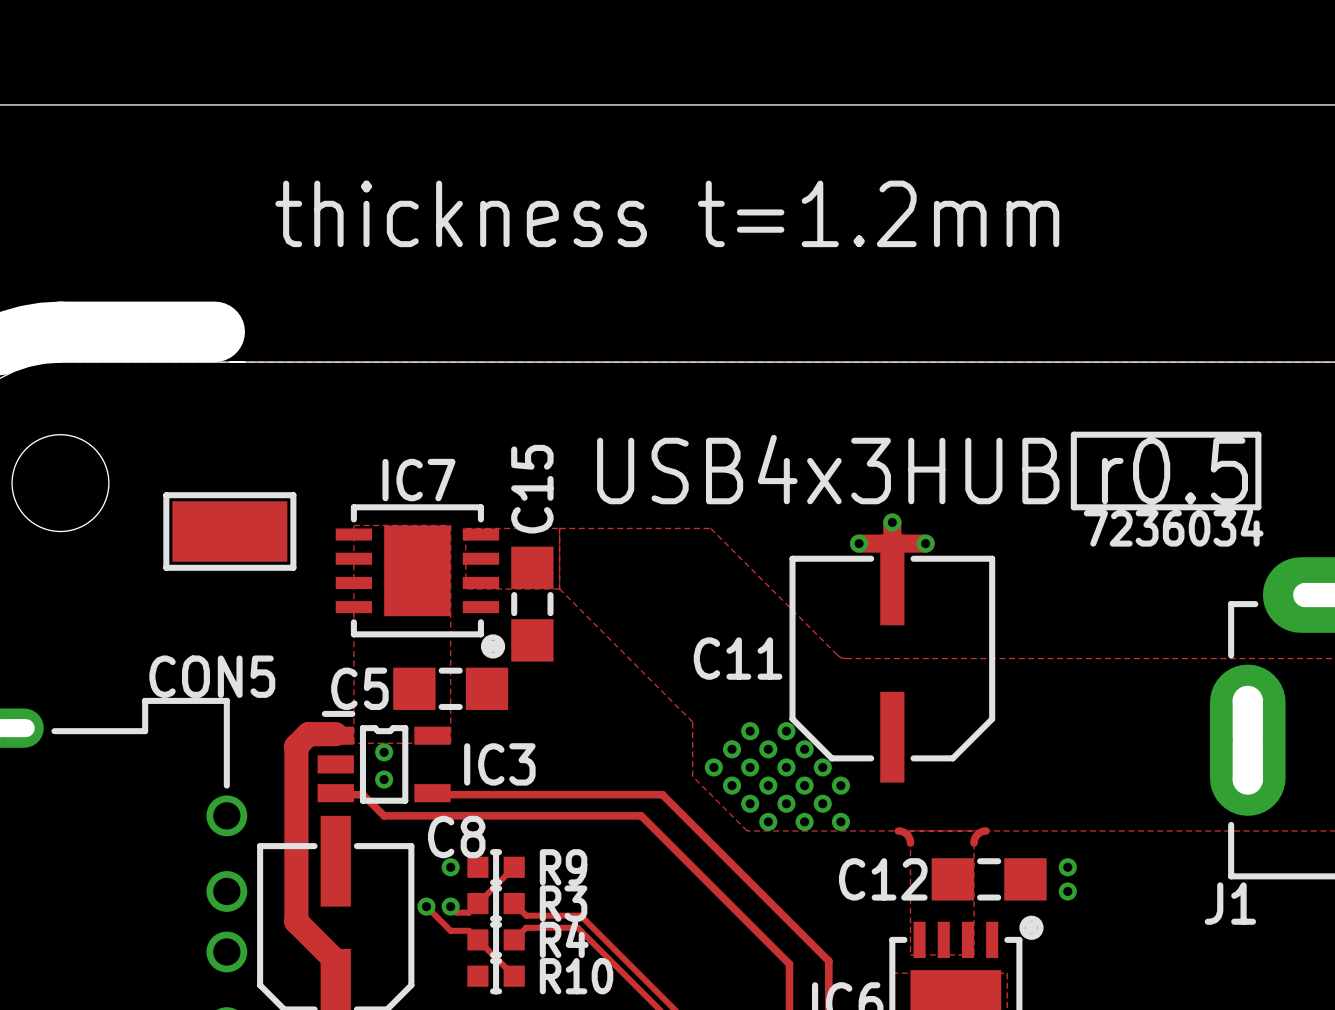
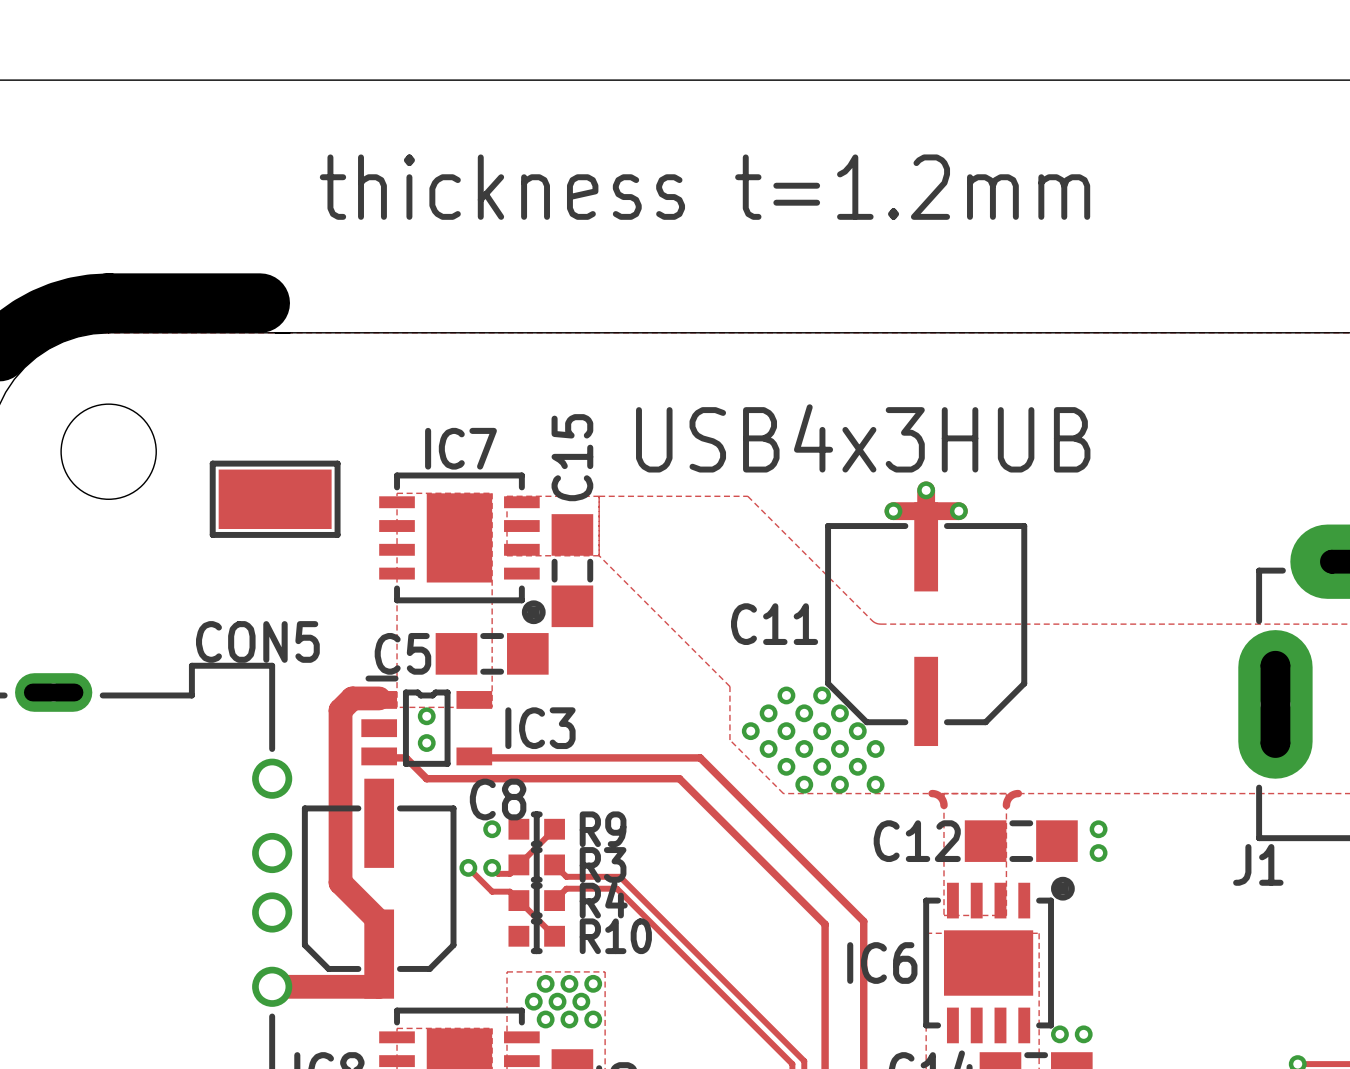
drawing: [1070, 431, 1262, 511] -> none

